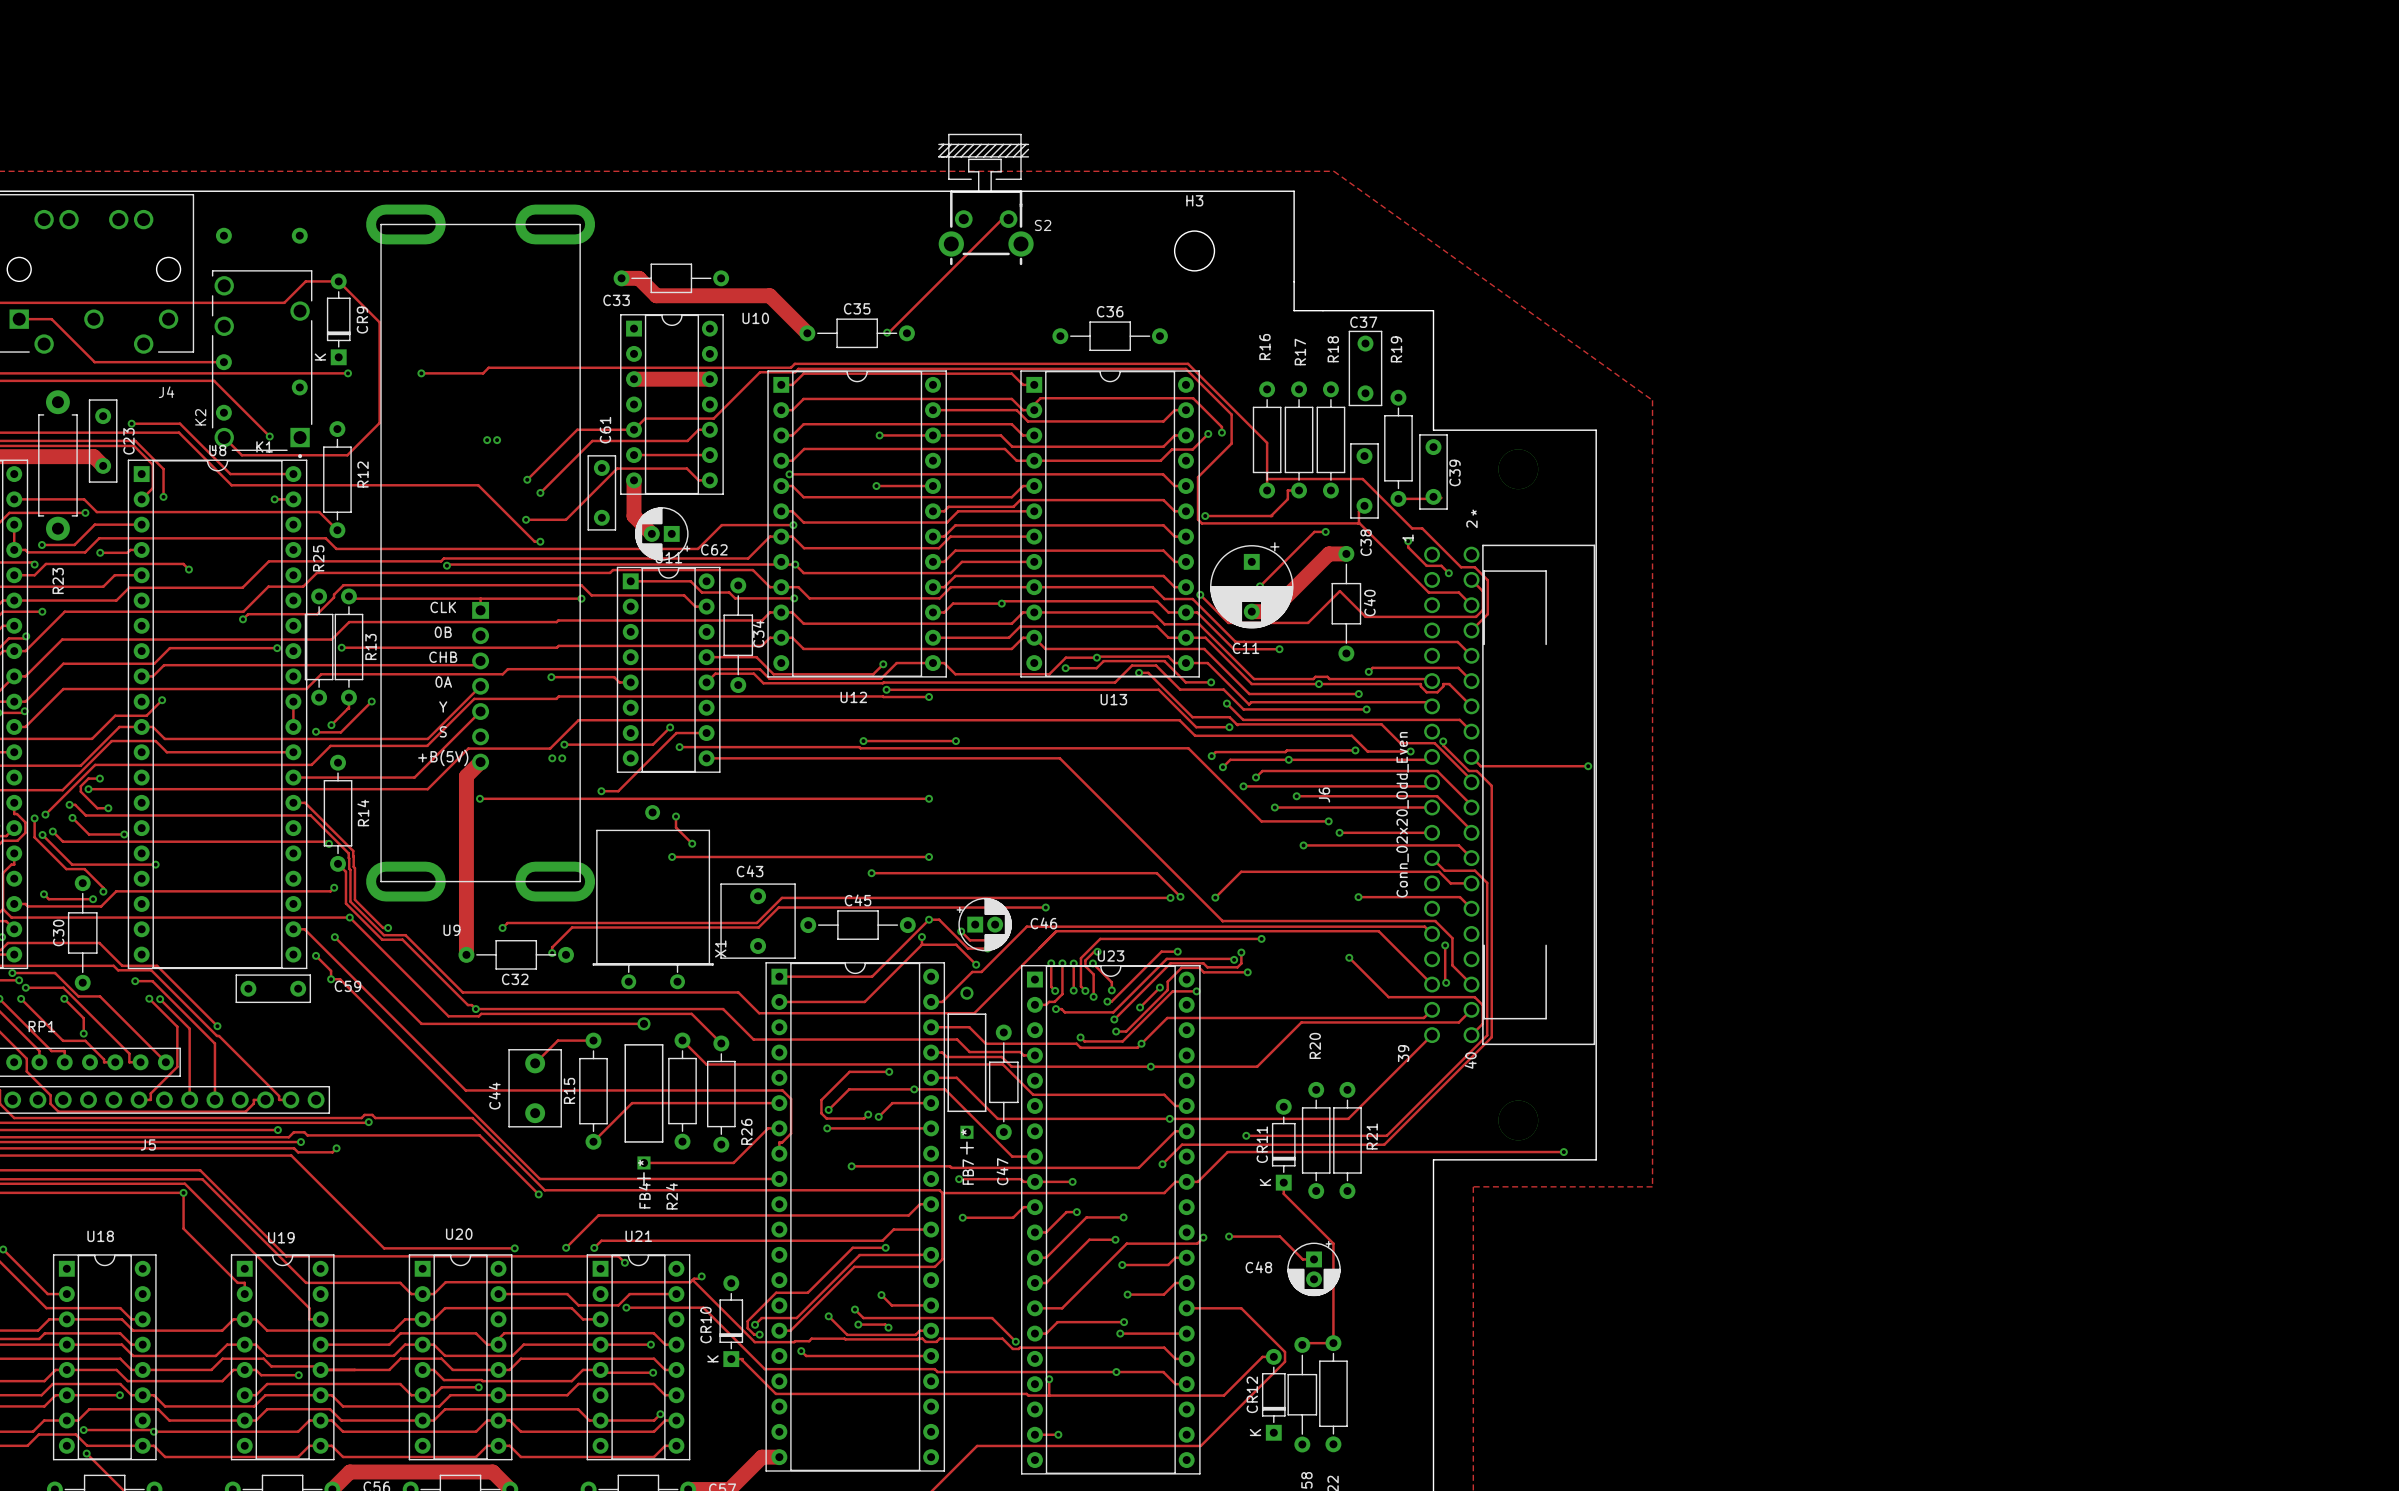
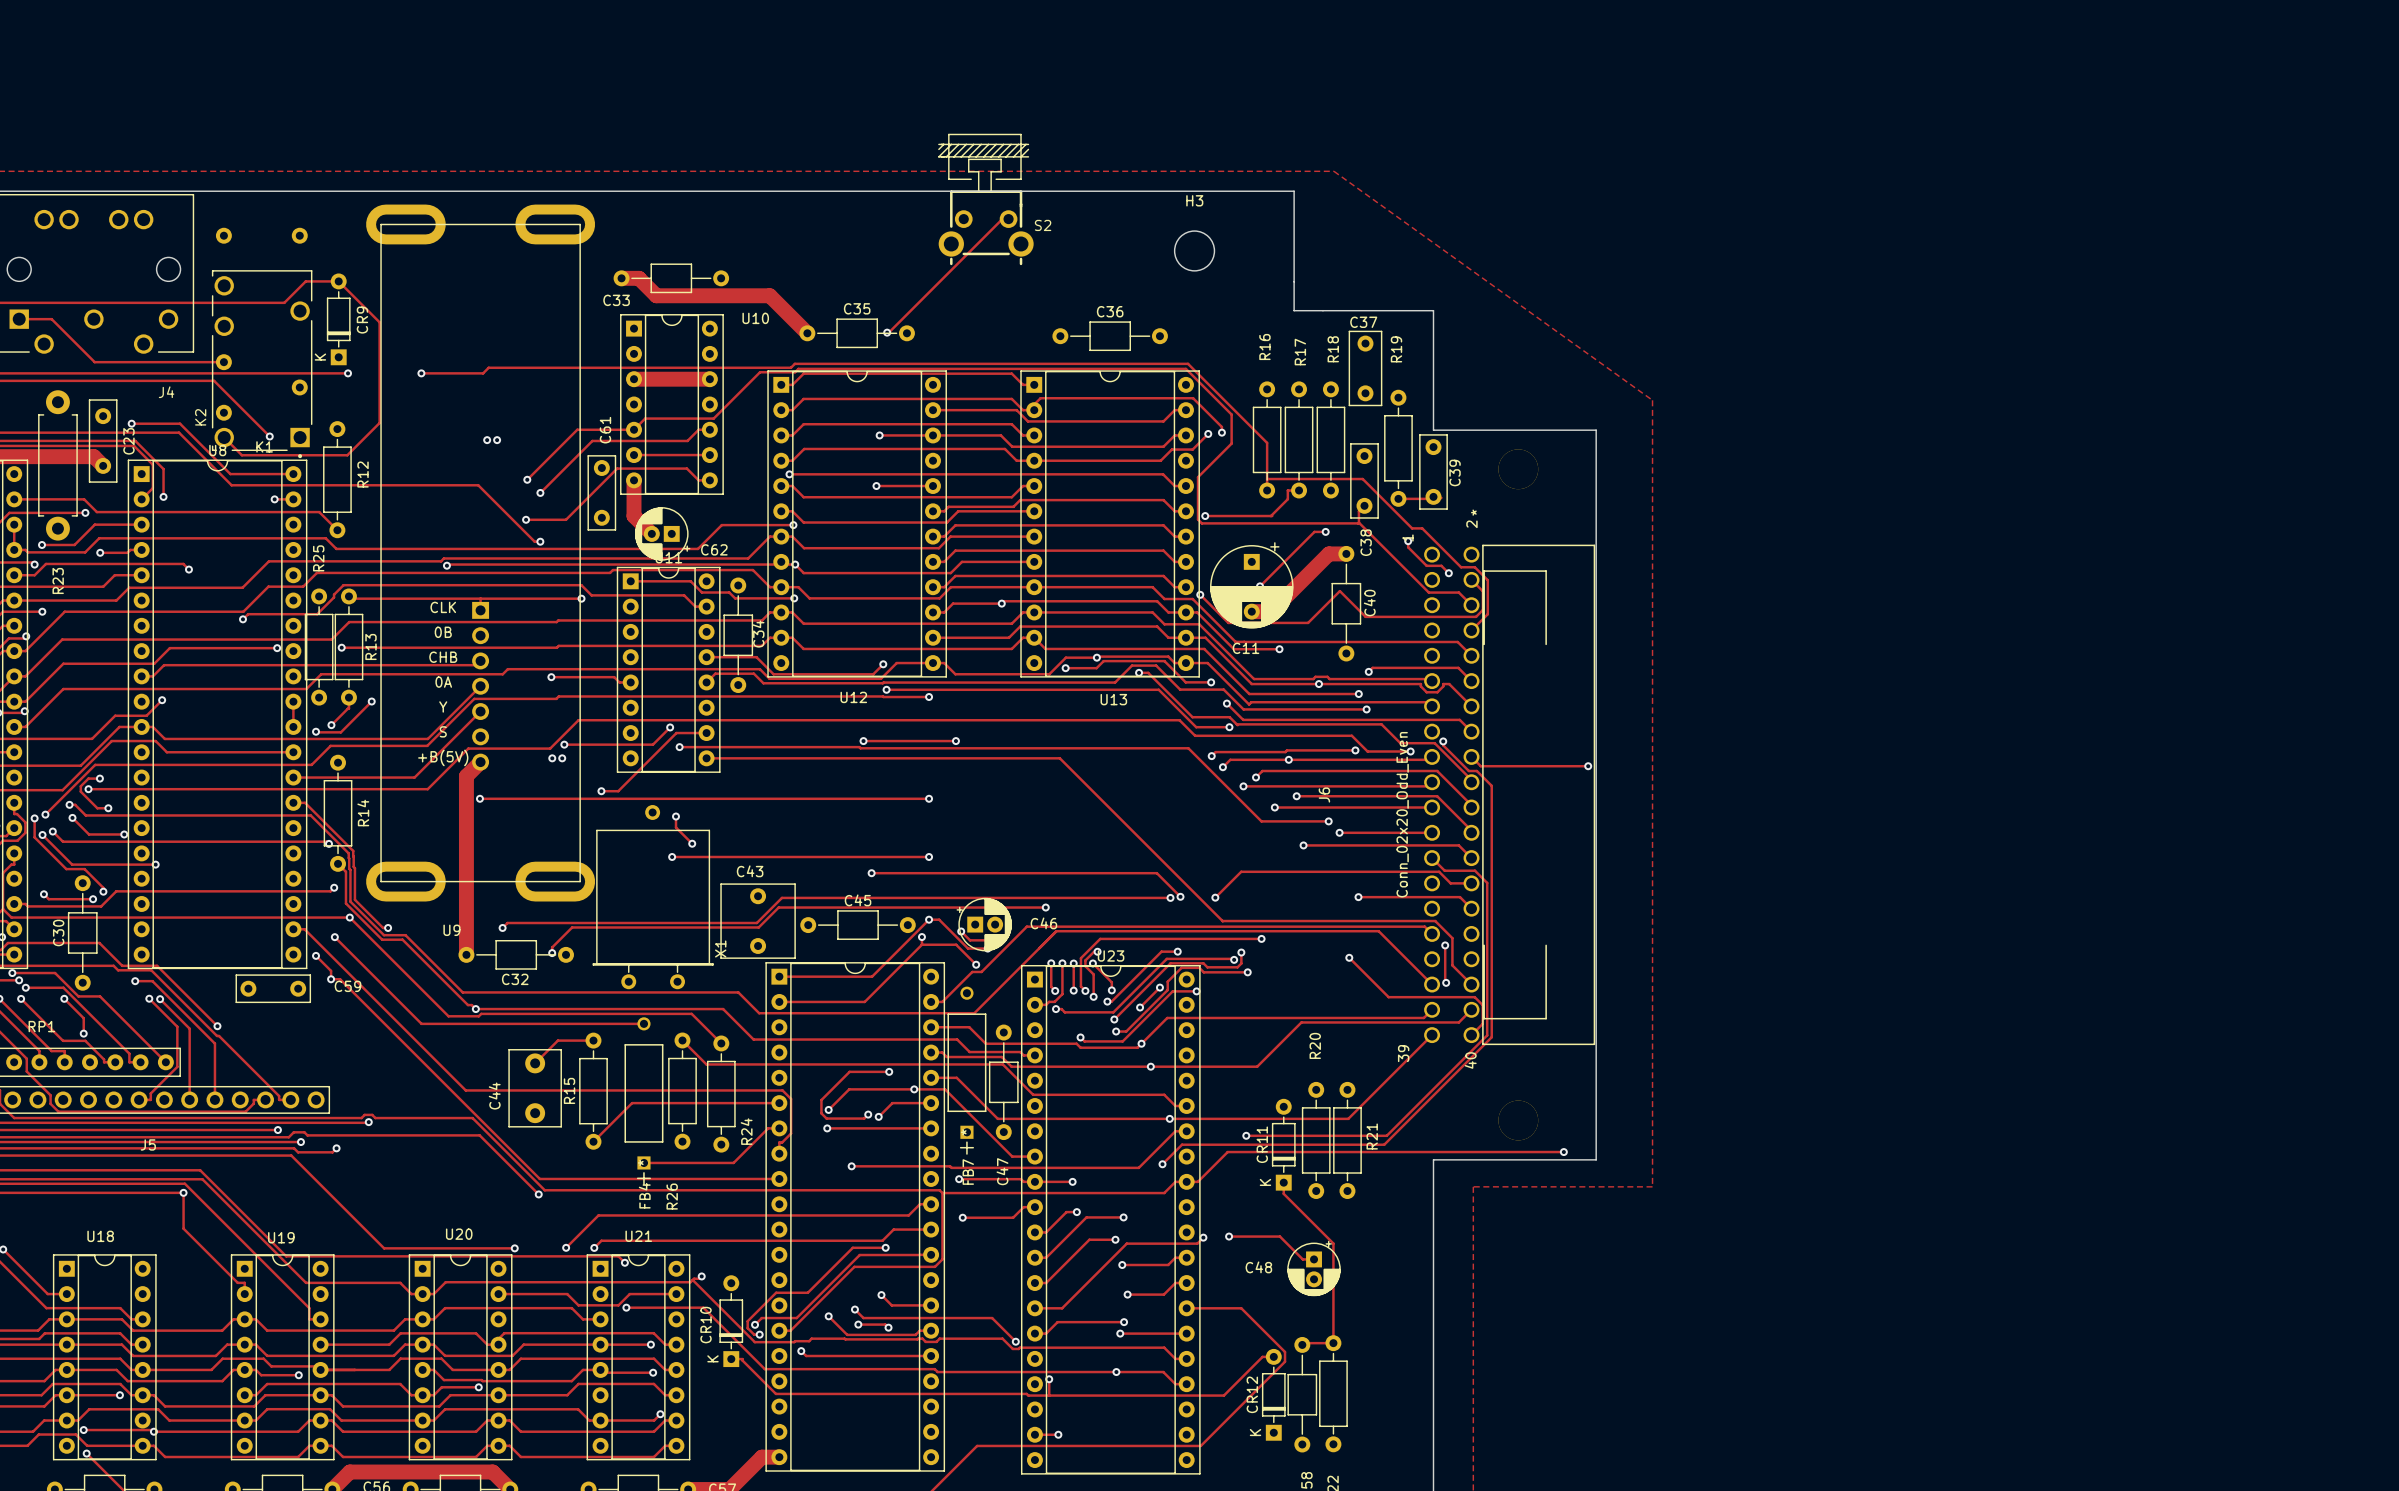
R26 name: R26 (746, 1131) -> R24 (746, 1131)
R24 name: R24 (671, 1196) -> R26 (672, 1196)

